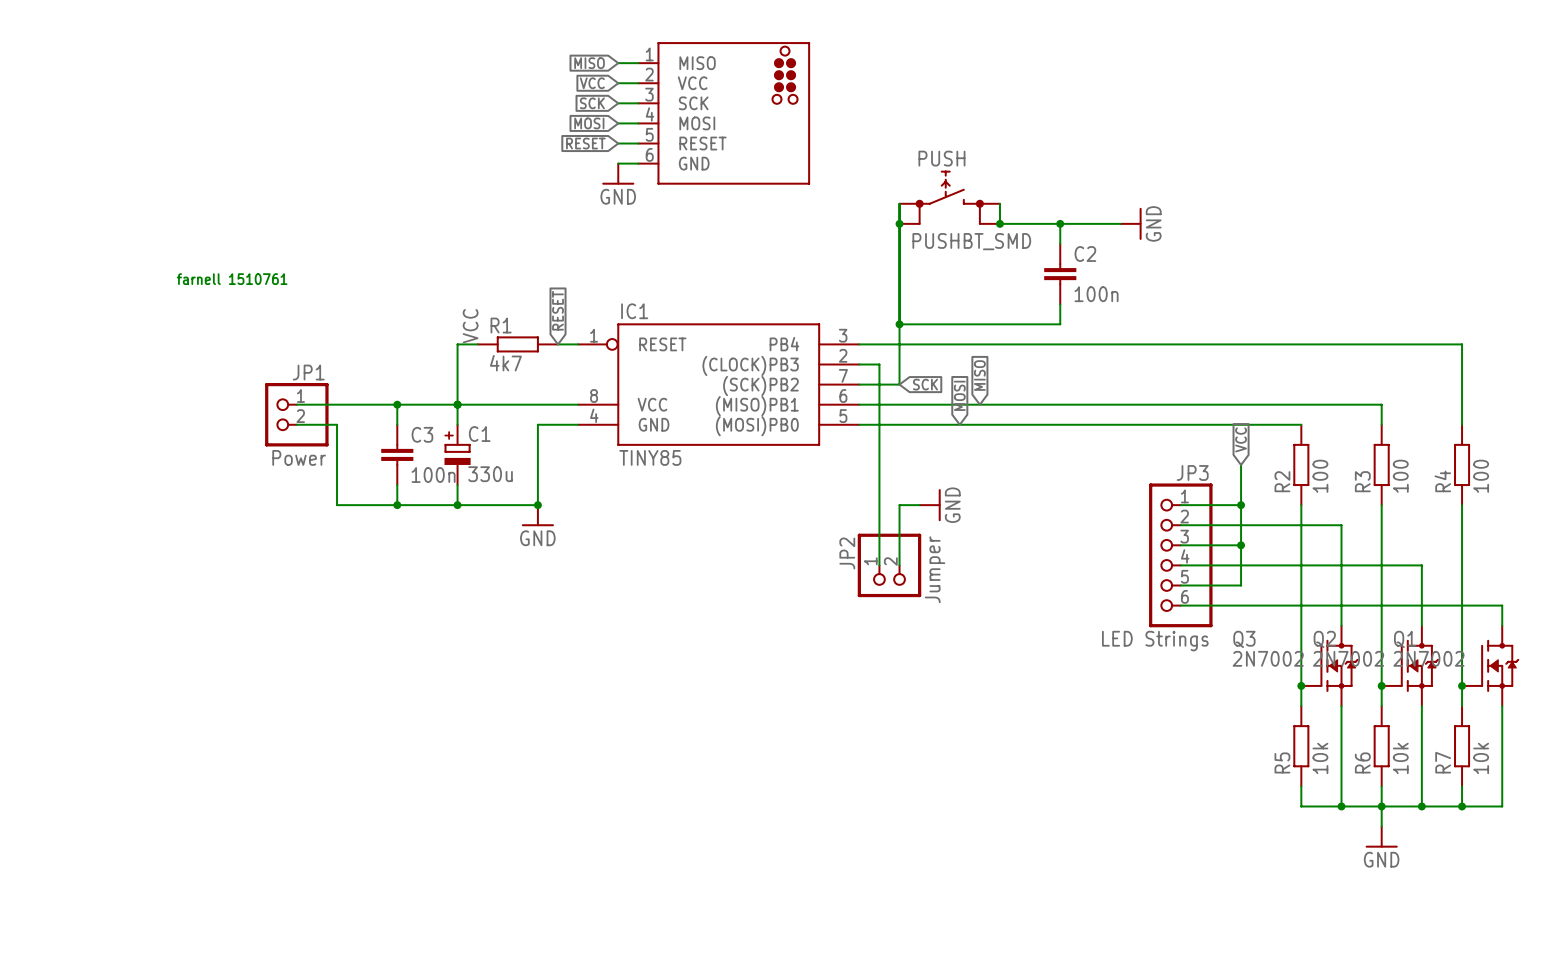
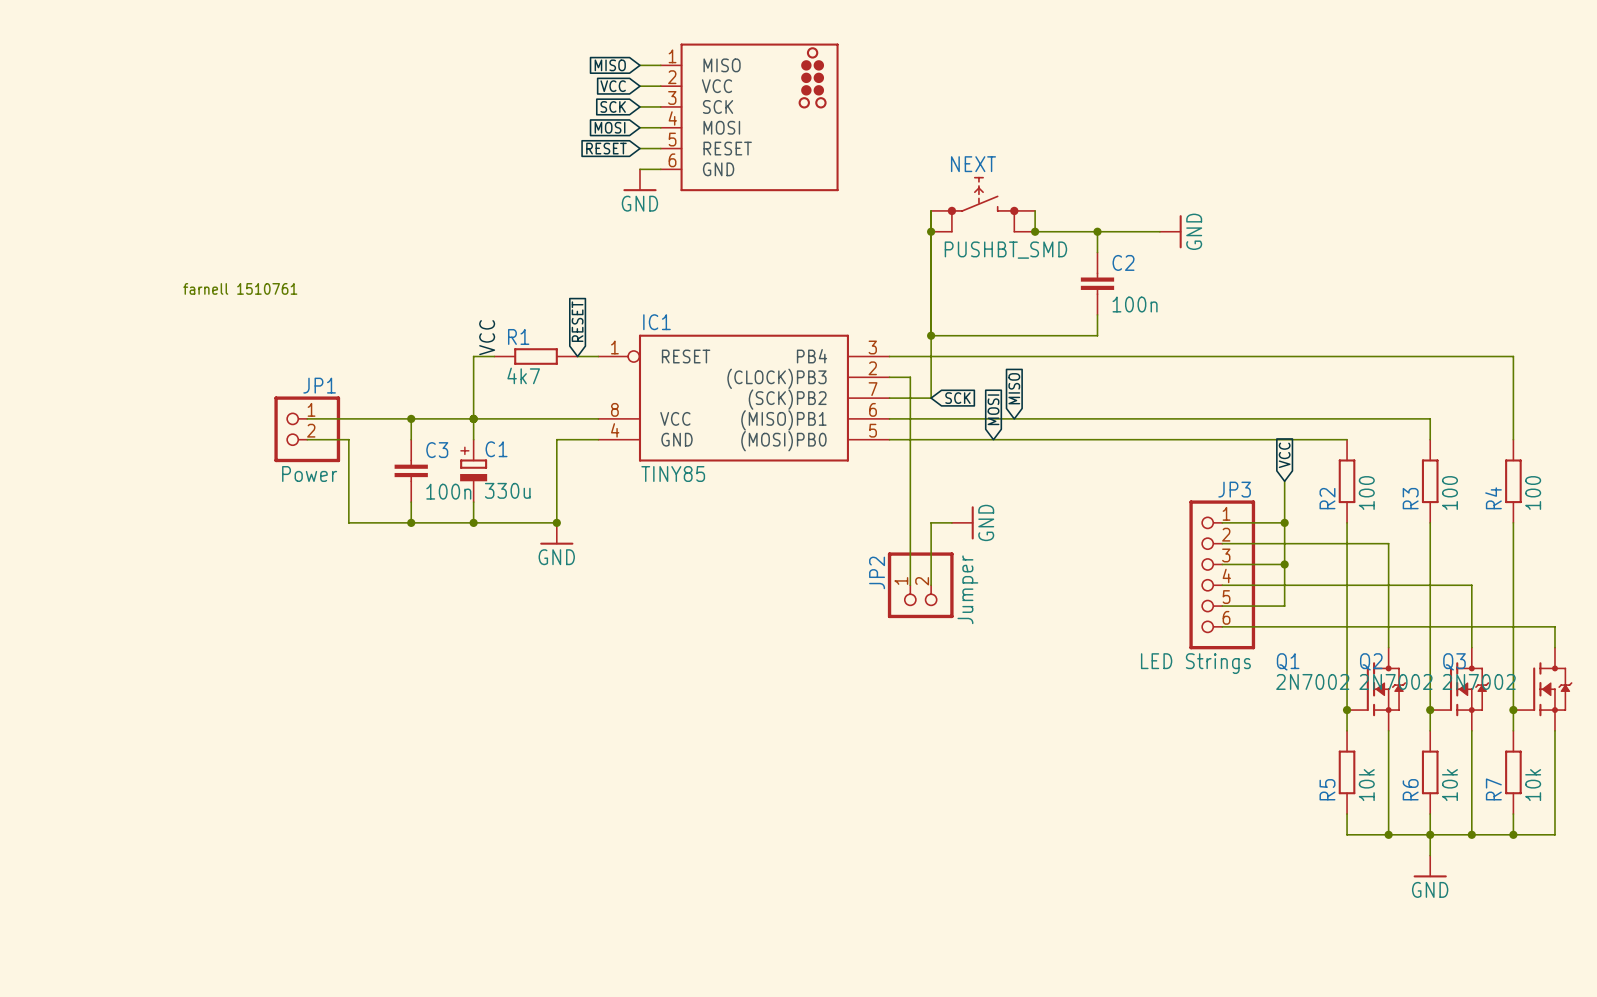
PUSH name: PUSH (941, 158) -> NEXT (973, 164)
Q3 name: Q3 (1244, 639) -> Q1 (1288, 661)
Q1 name: Q1 (1405, 639) -> Q3 (1454, 661)

